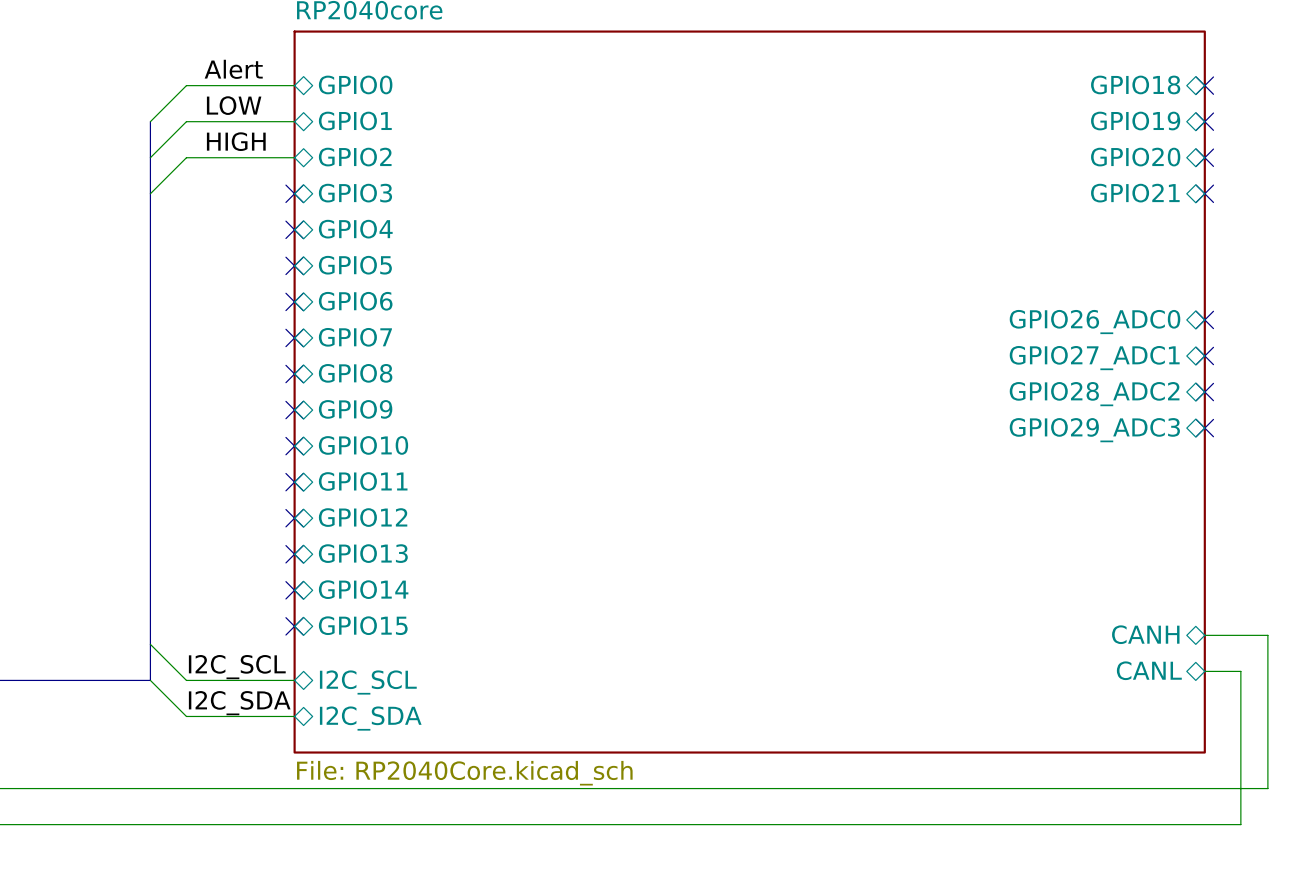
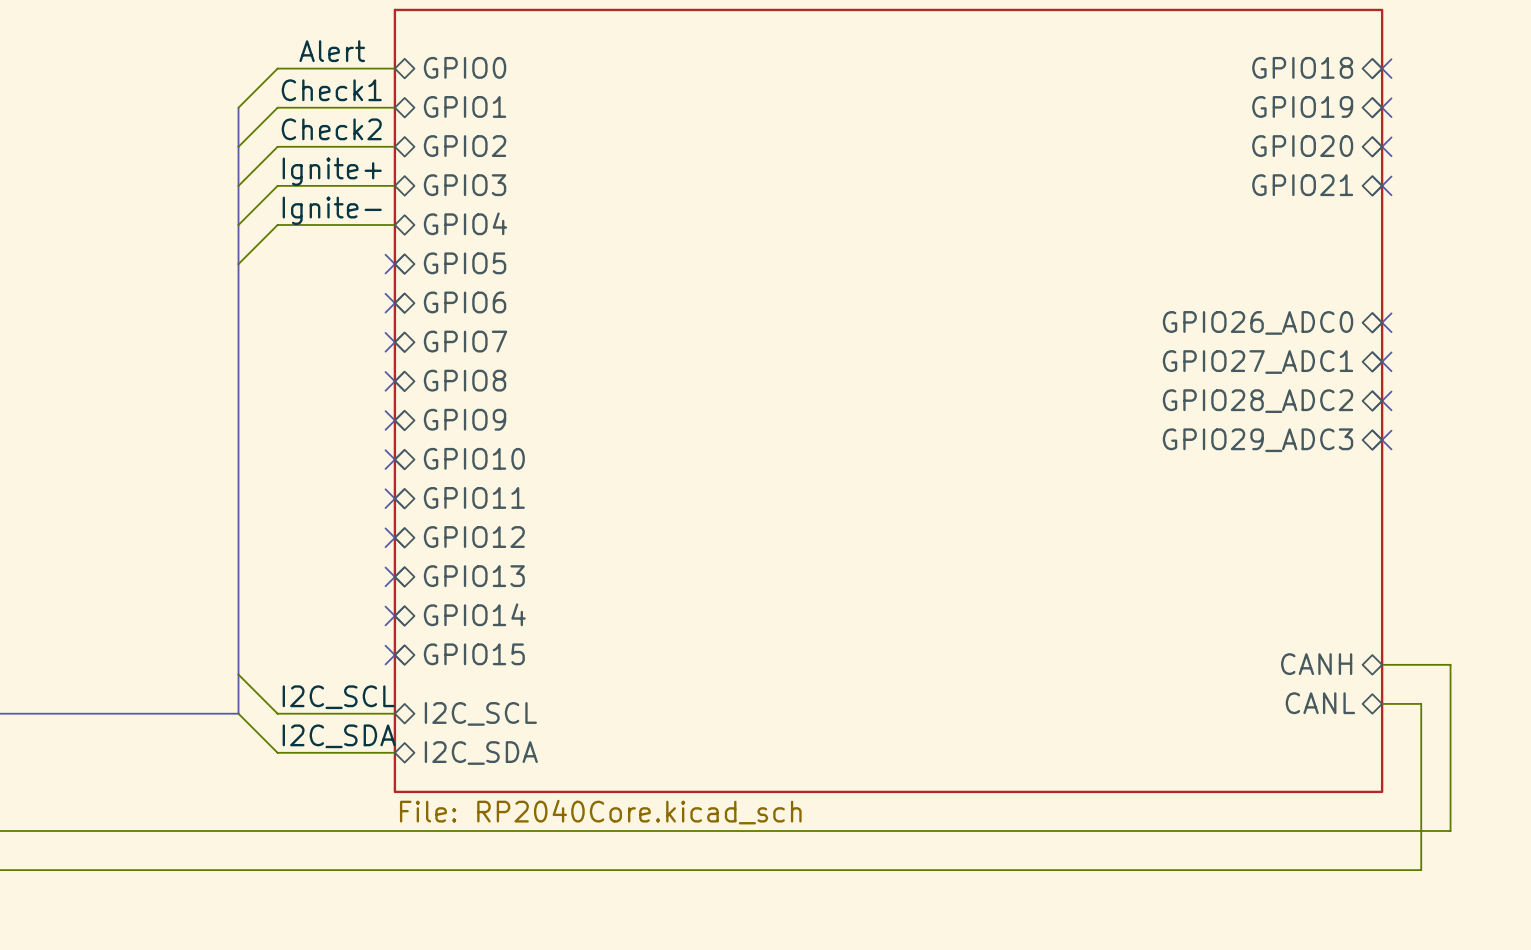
label: none -> Check1 (331, 90)
label: LOW (234, 105) -> none
label: none -> Check2 (331, 129)
label: HIGH (236, 141) -> none
label: none -> Ignite+ (332, 171)
wire: none -> (394, 185) (277, 185) (238, 224)
no-connect mark: (294, 193) -> none
label: none -> Ignite- (332, 210)
wire: none -> (394, 224) (277, 224) (238, 264)
no-connect mark: (294, 229) -> none

